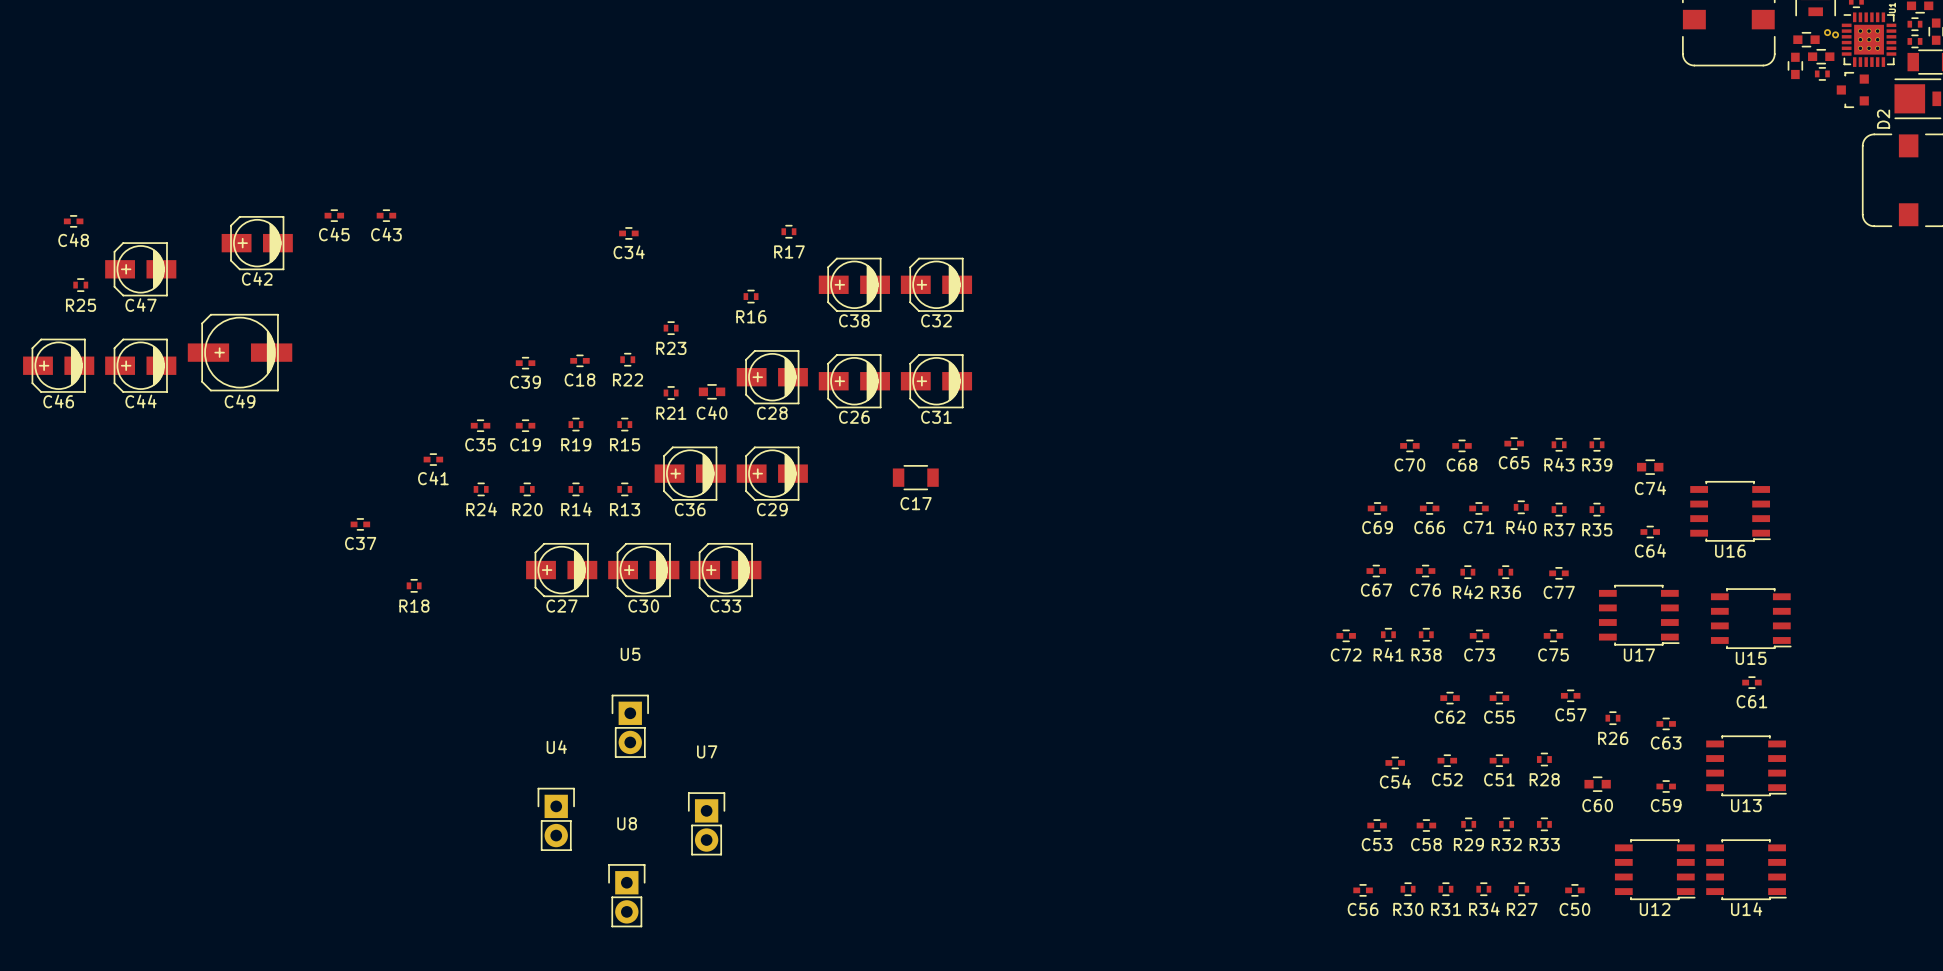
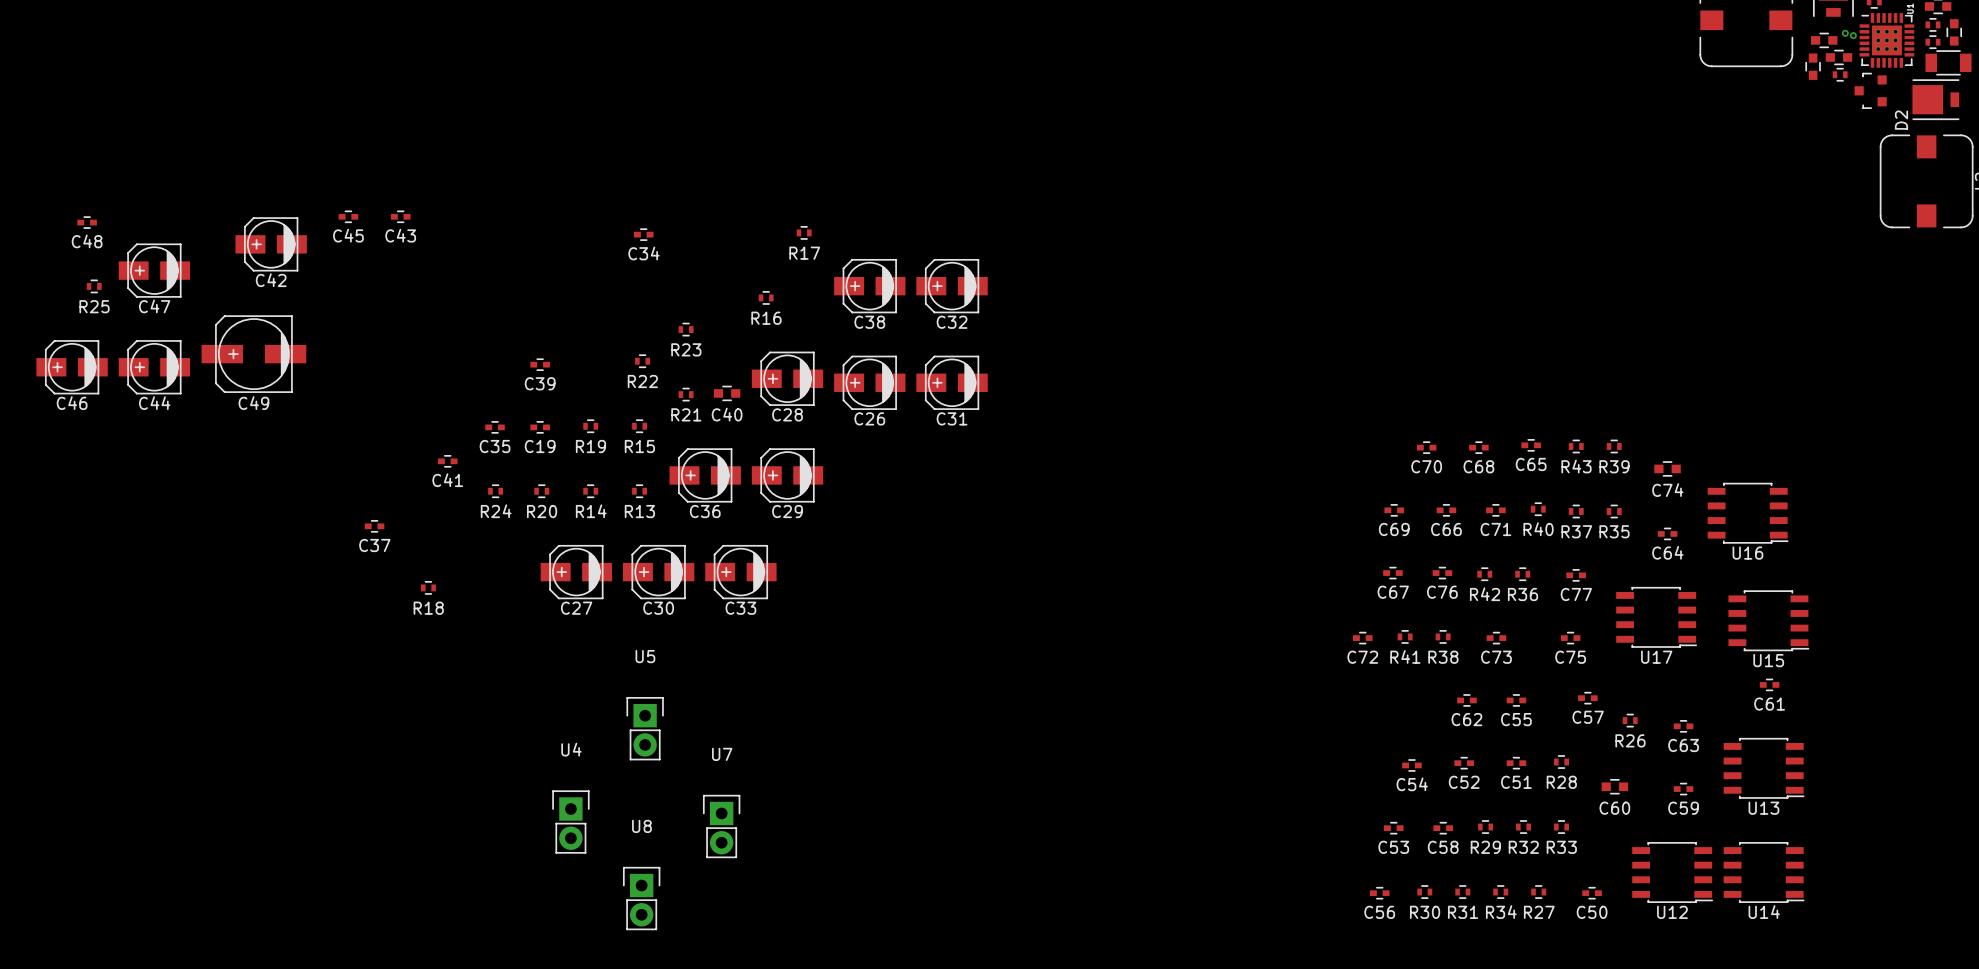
C18: (579, 360) -> none
C17: (915, 477) -> none

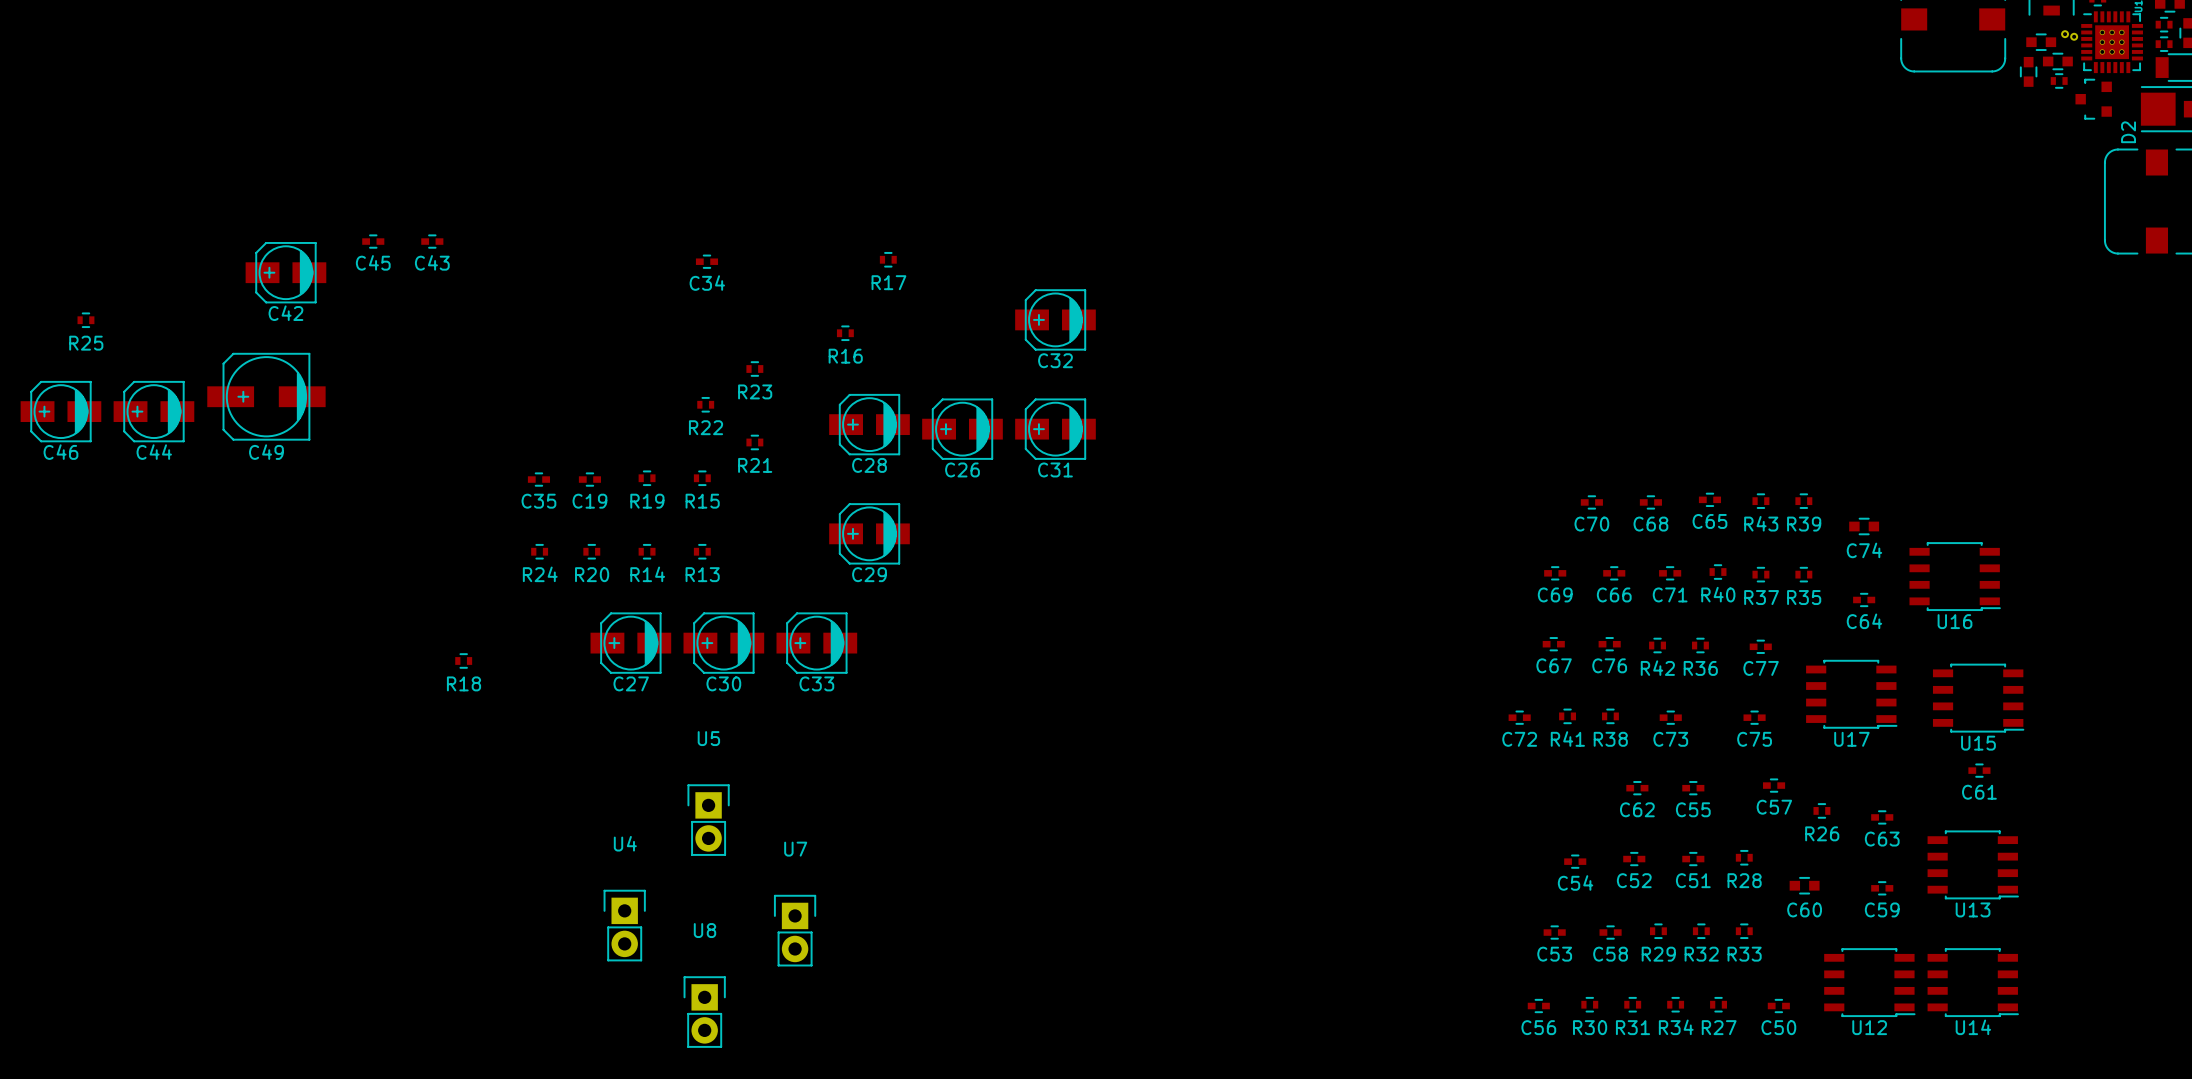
C48: (87, 222) -> none
C47: (154, 270) -> none
C38: (869, 286) -> none
C39: (540, 364) -> none
C40: (727, 393) -> none
C41: (447, 461) -> none
C36: (705, 475) -> none
C37: (374, 526) -> none

